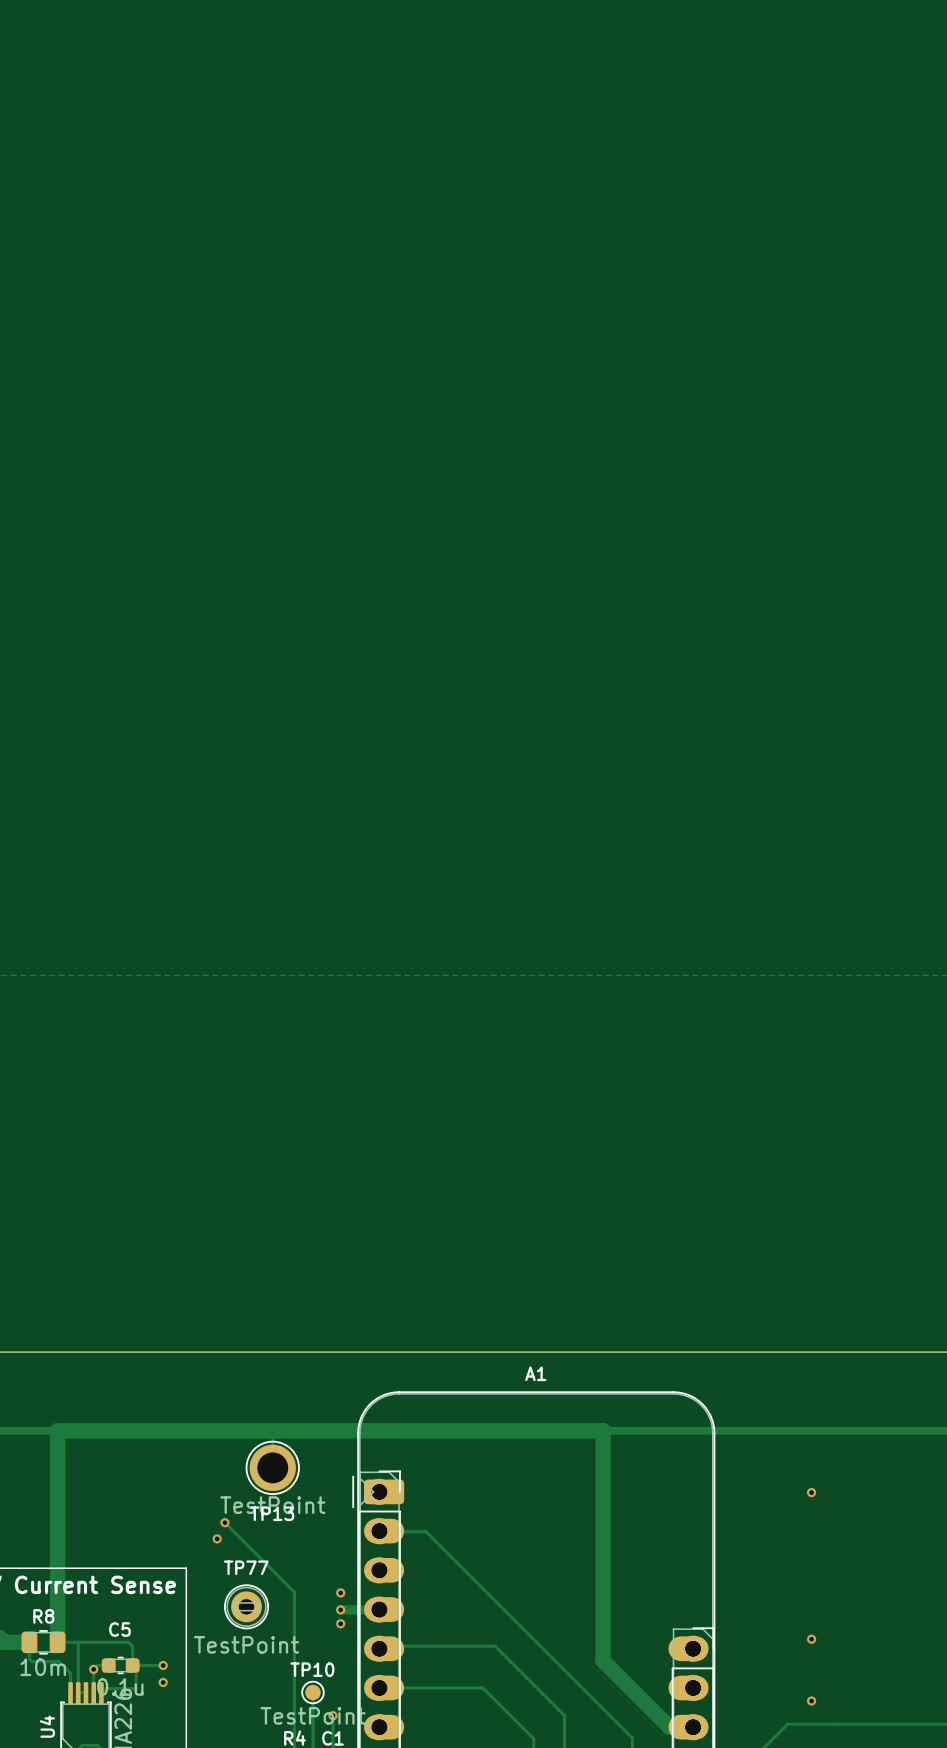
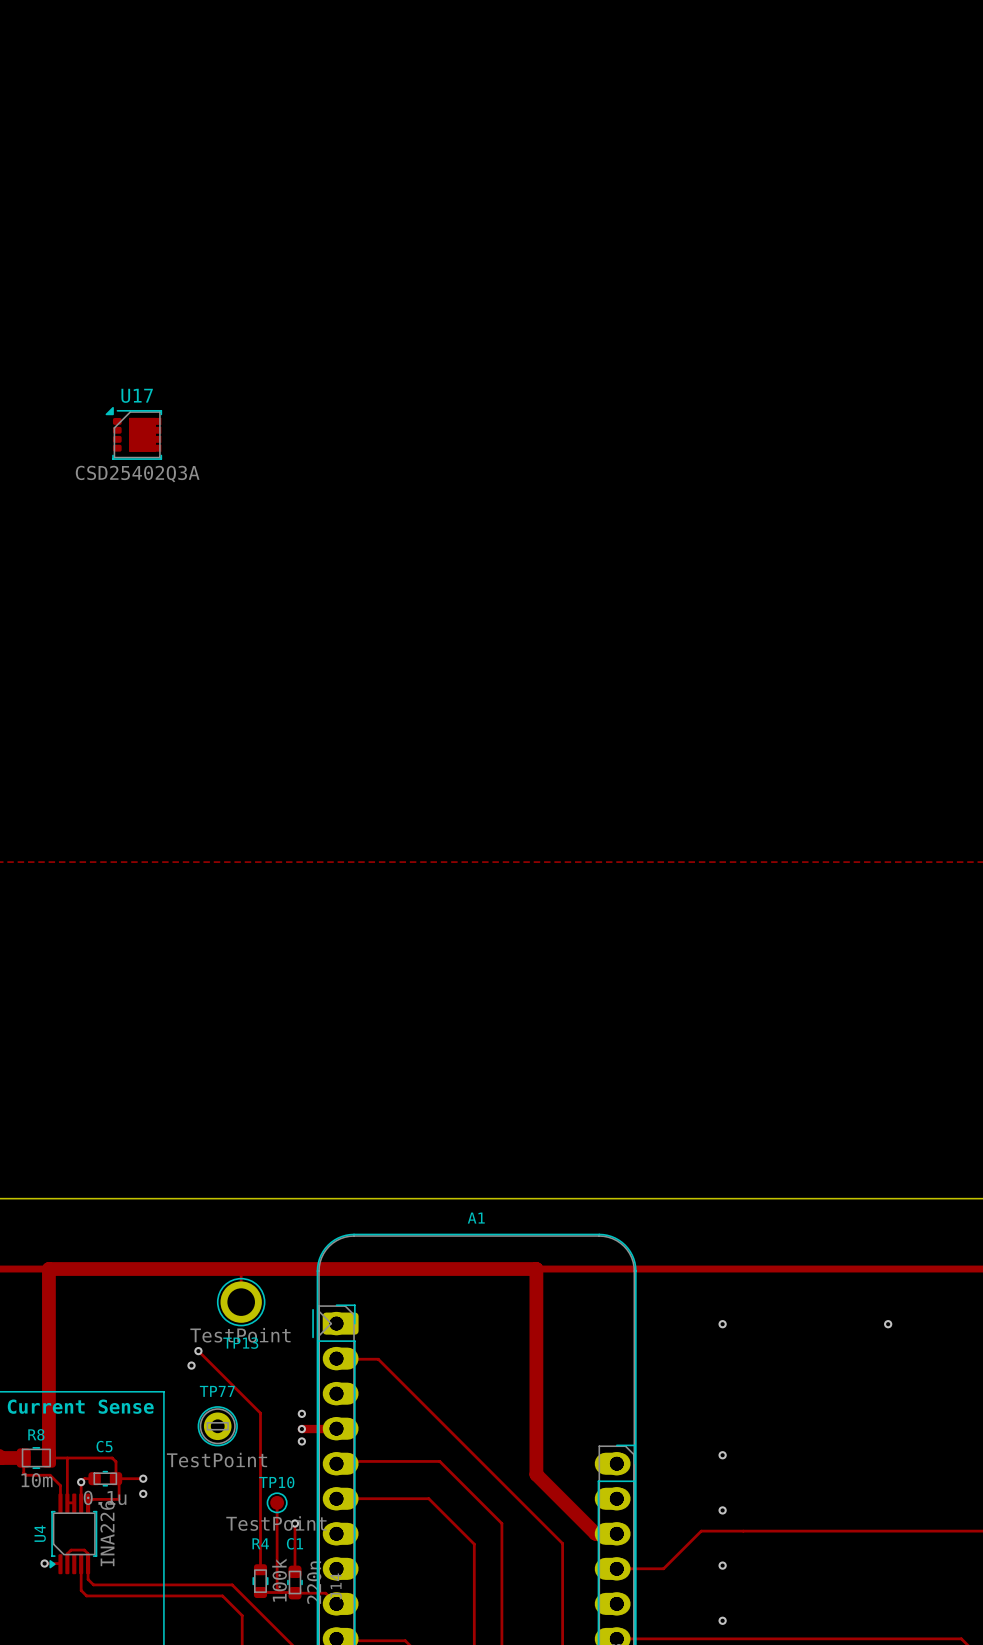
U17: none -> CSD25402Q3A (133, 433)

